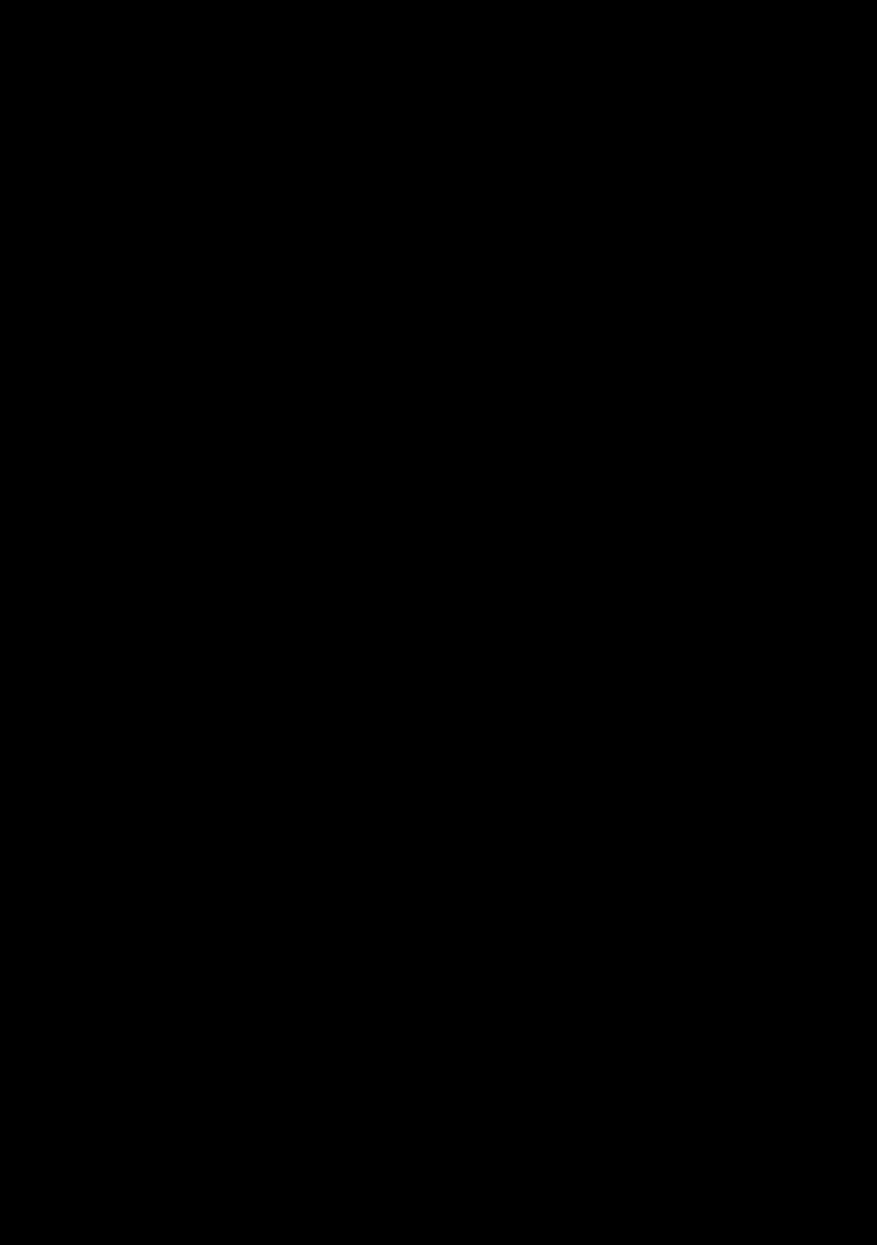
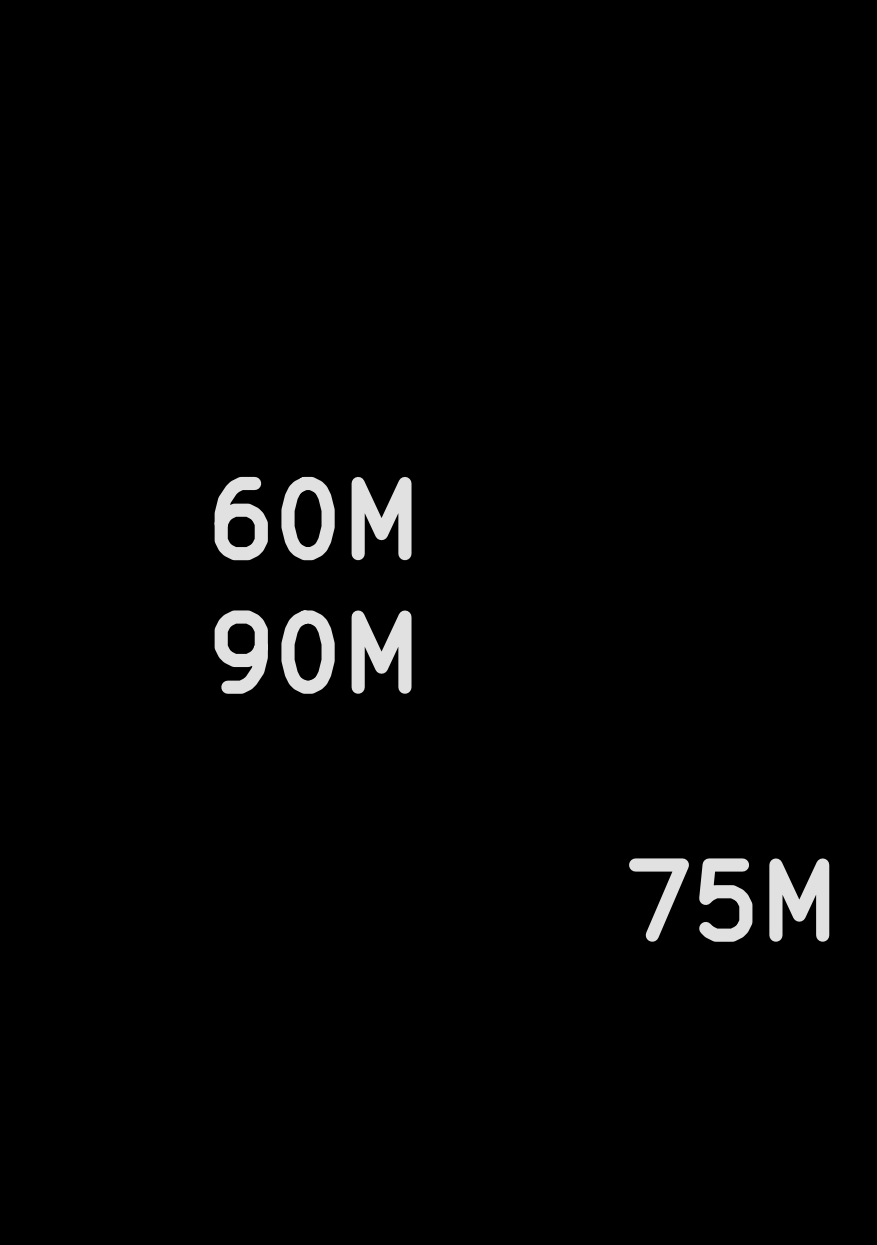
text: none -> 60M (313, 518)
text: none -> 90M (313, 652)
text: none -> 75M (729, 900)

